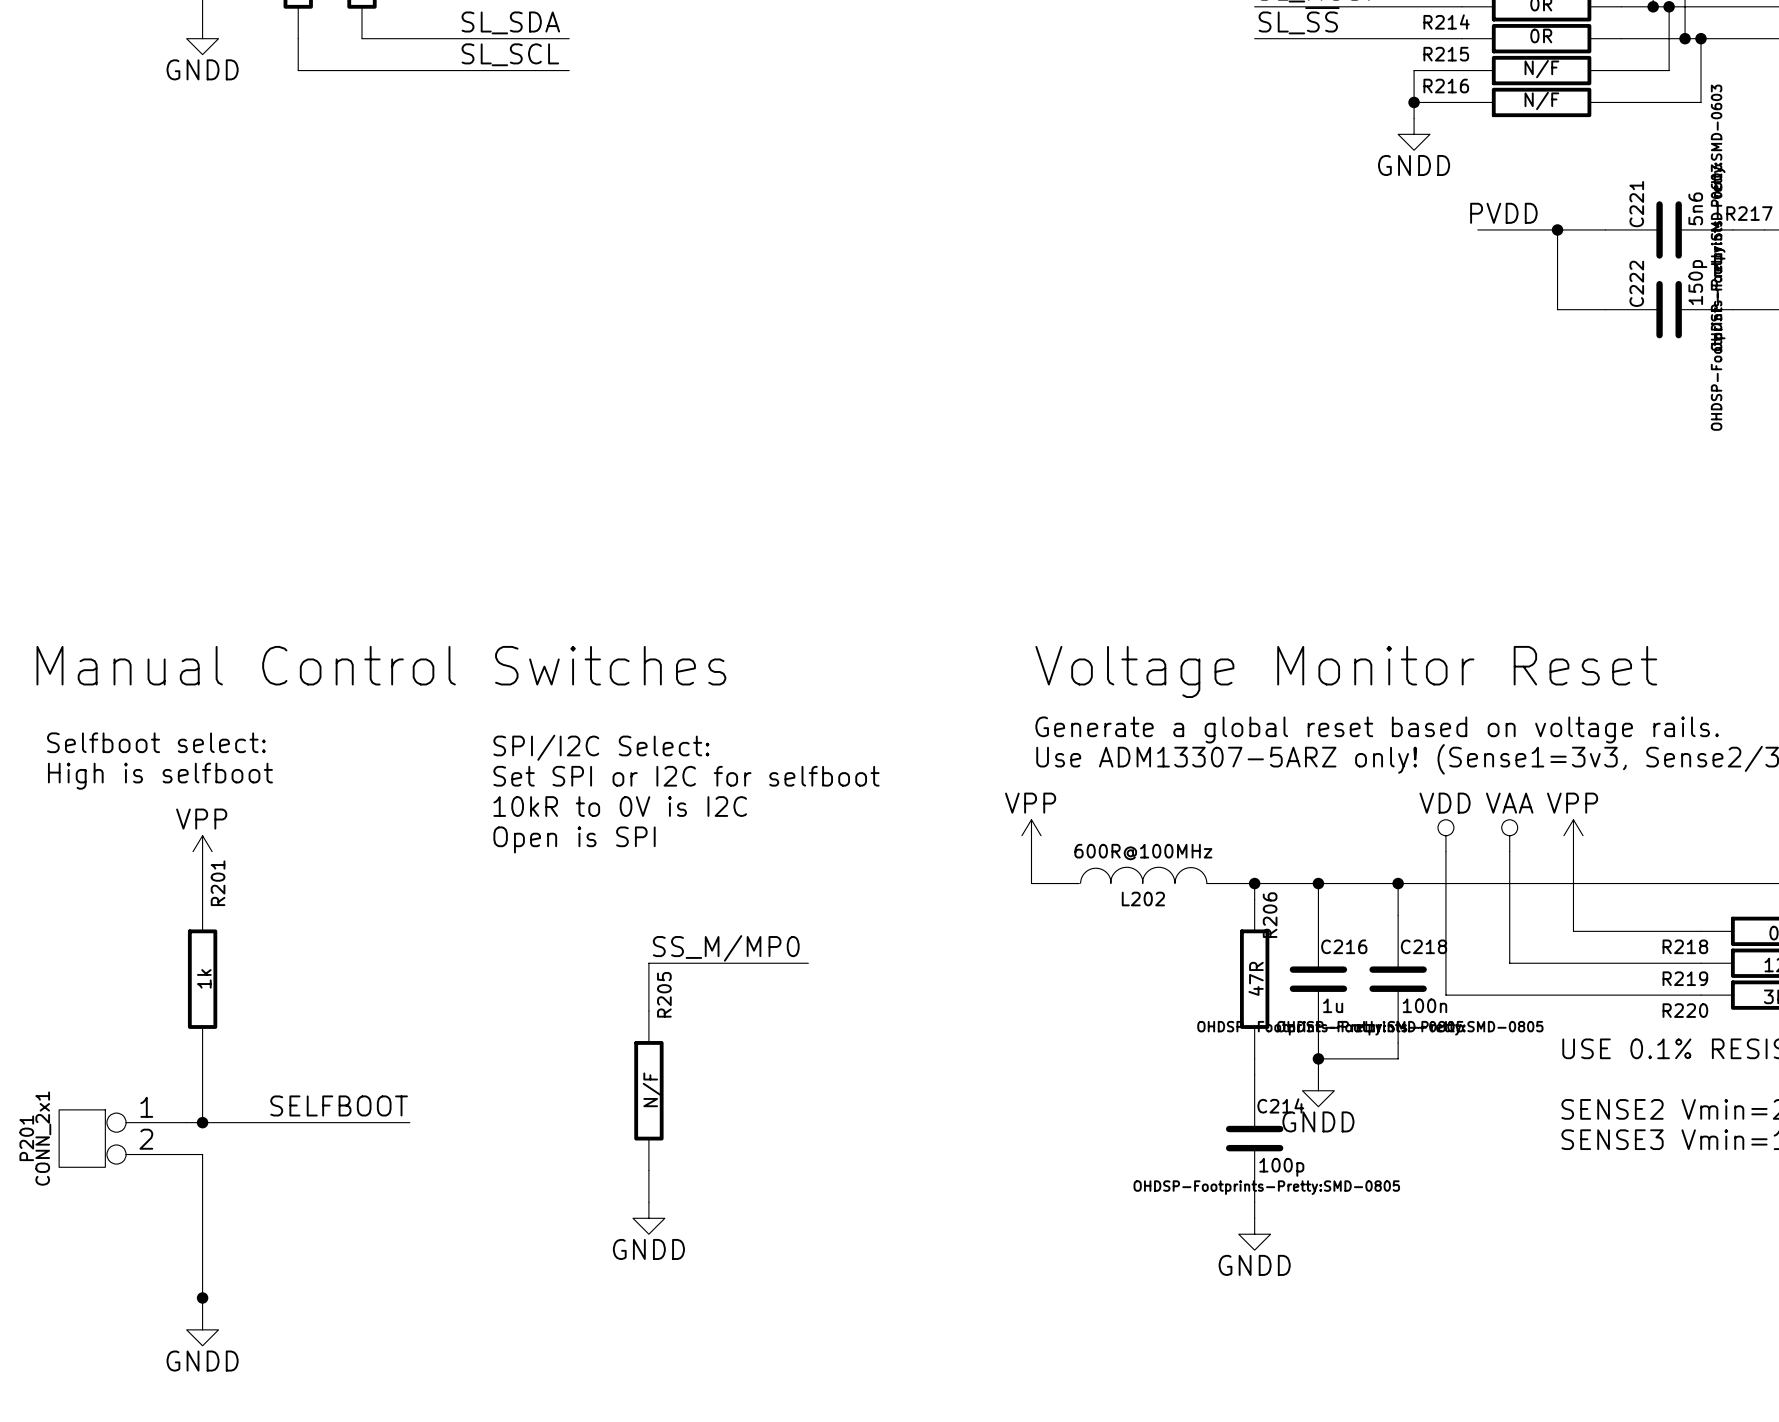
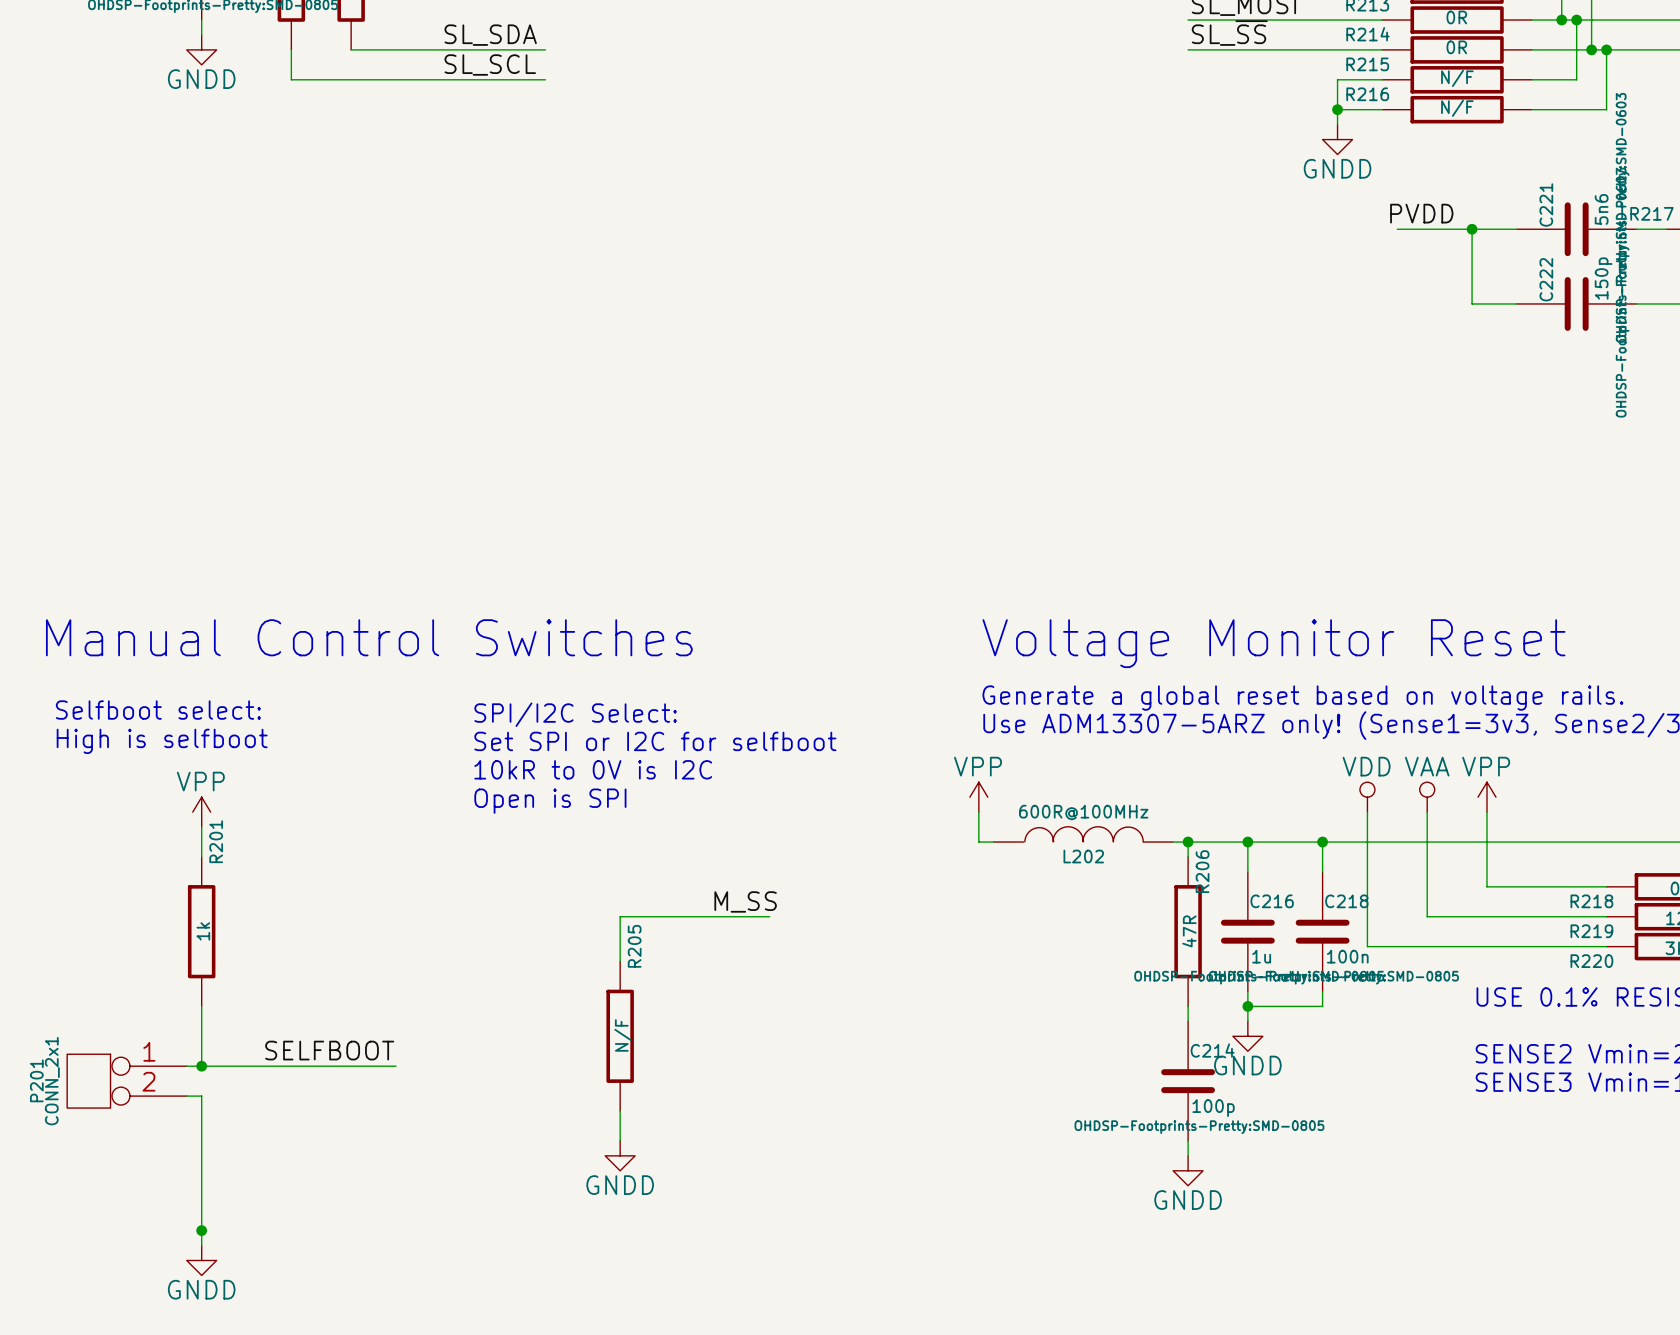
label: none -> M_SS (745, 901)
label: SS_M/MP0 (726, 948) -> none

